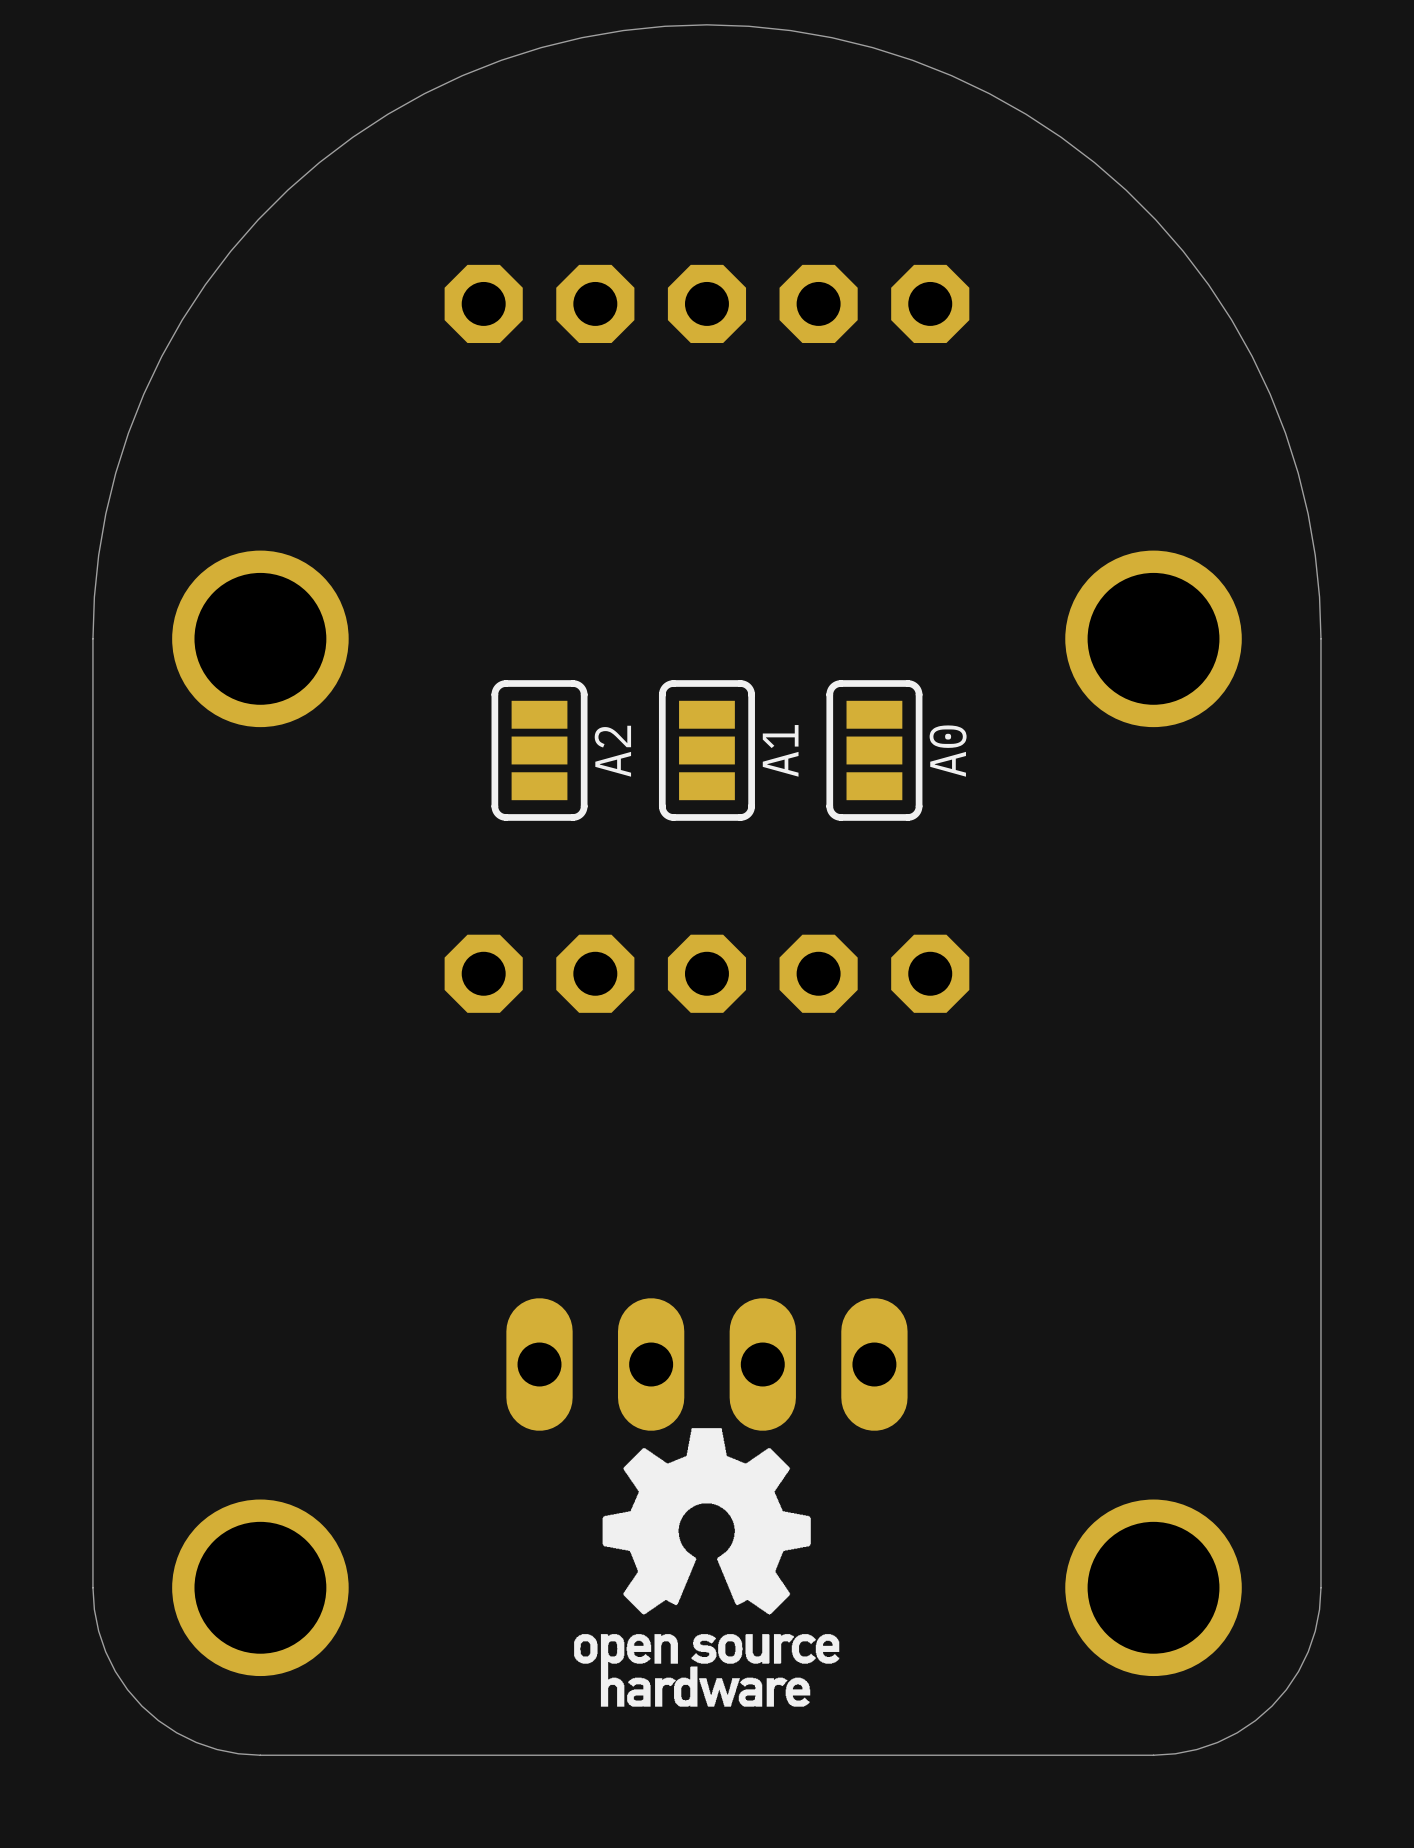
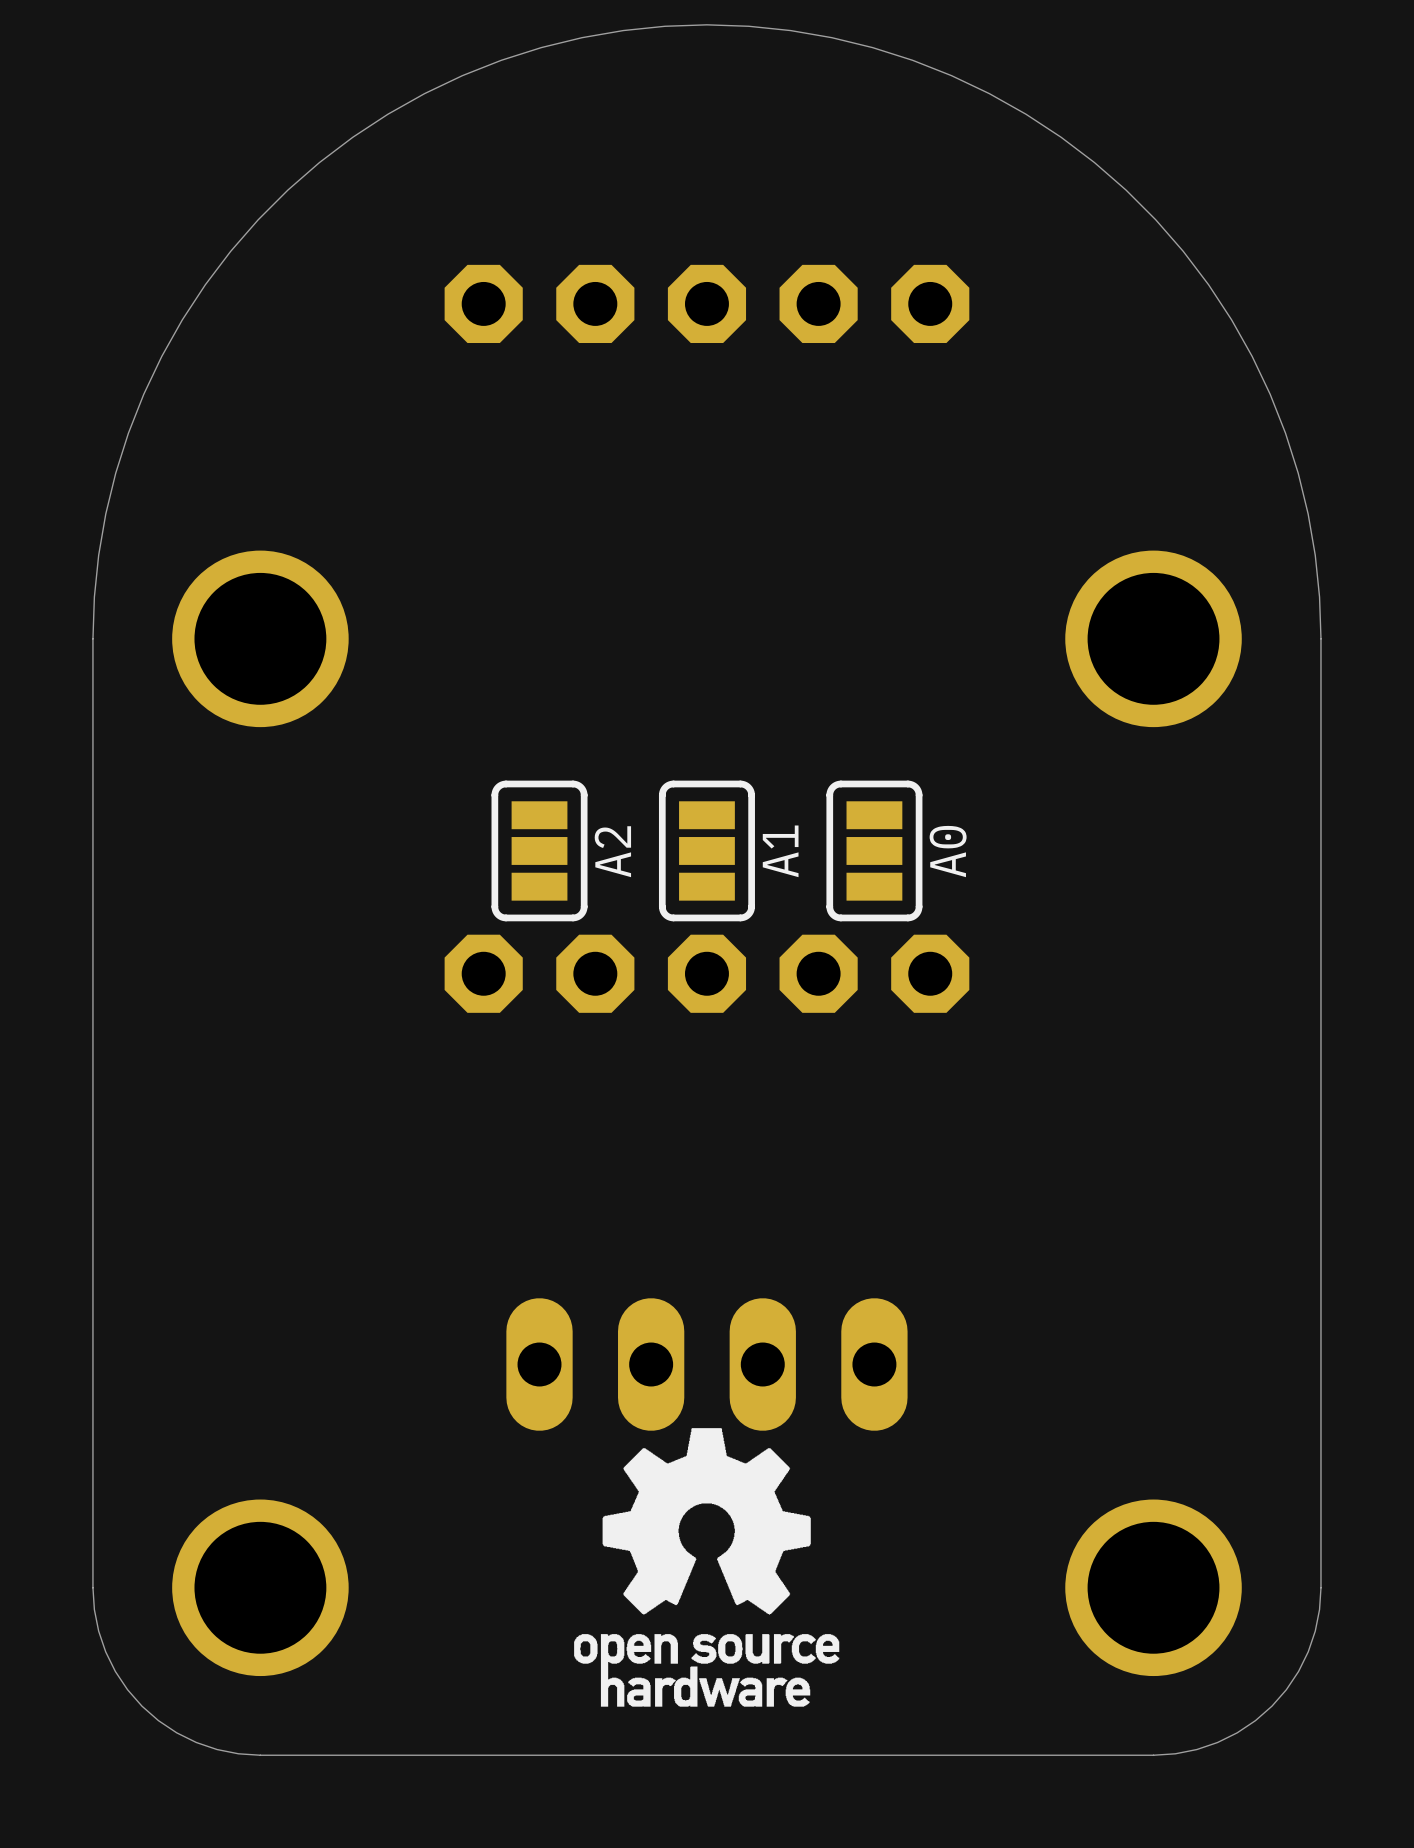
A2 position: (539, 750) -> (539, 850)
A1 position: (706, 750) -> (706, 850)
A0 position: (874, 750) -> (874, 850)

